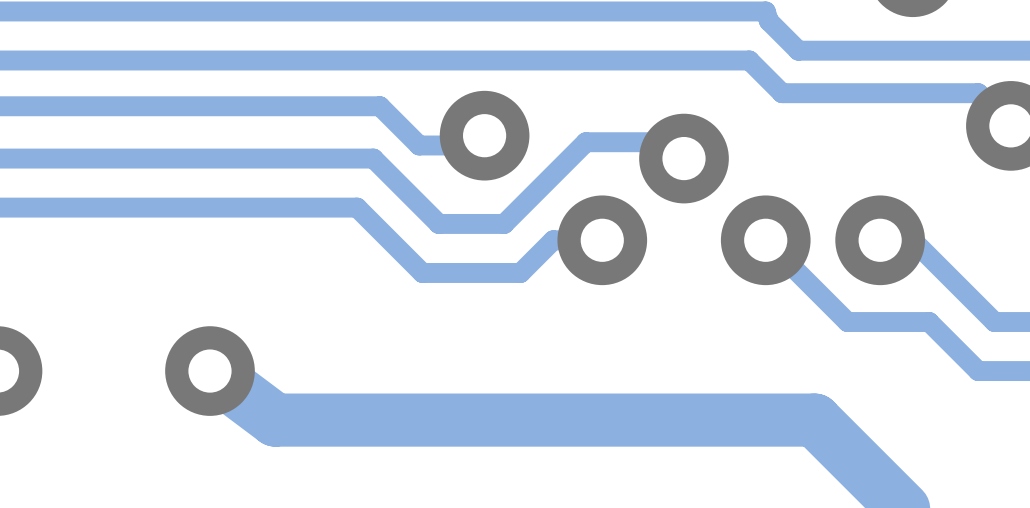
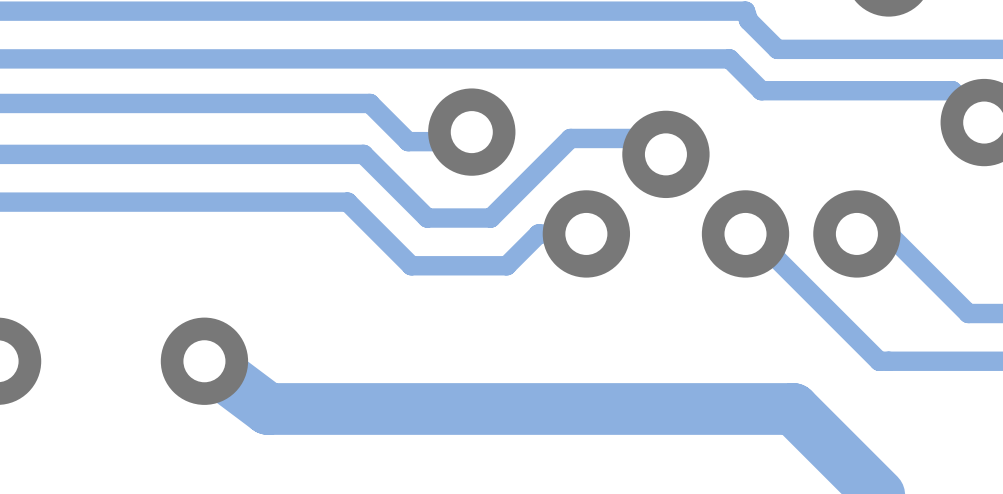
track: (765, 240) (847, 322) (929, 322) (978, 371) -> (748, 230) (879, 361) (952, 361)

